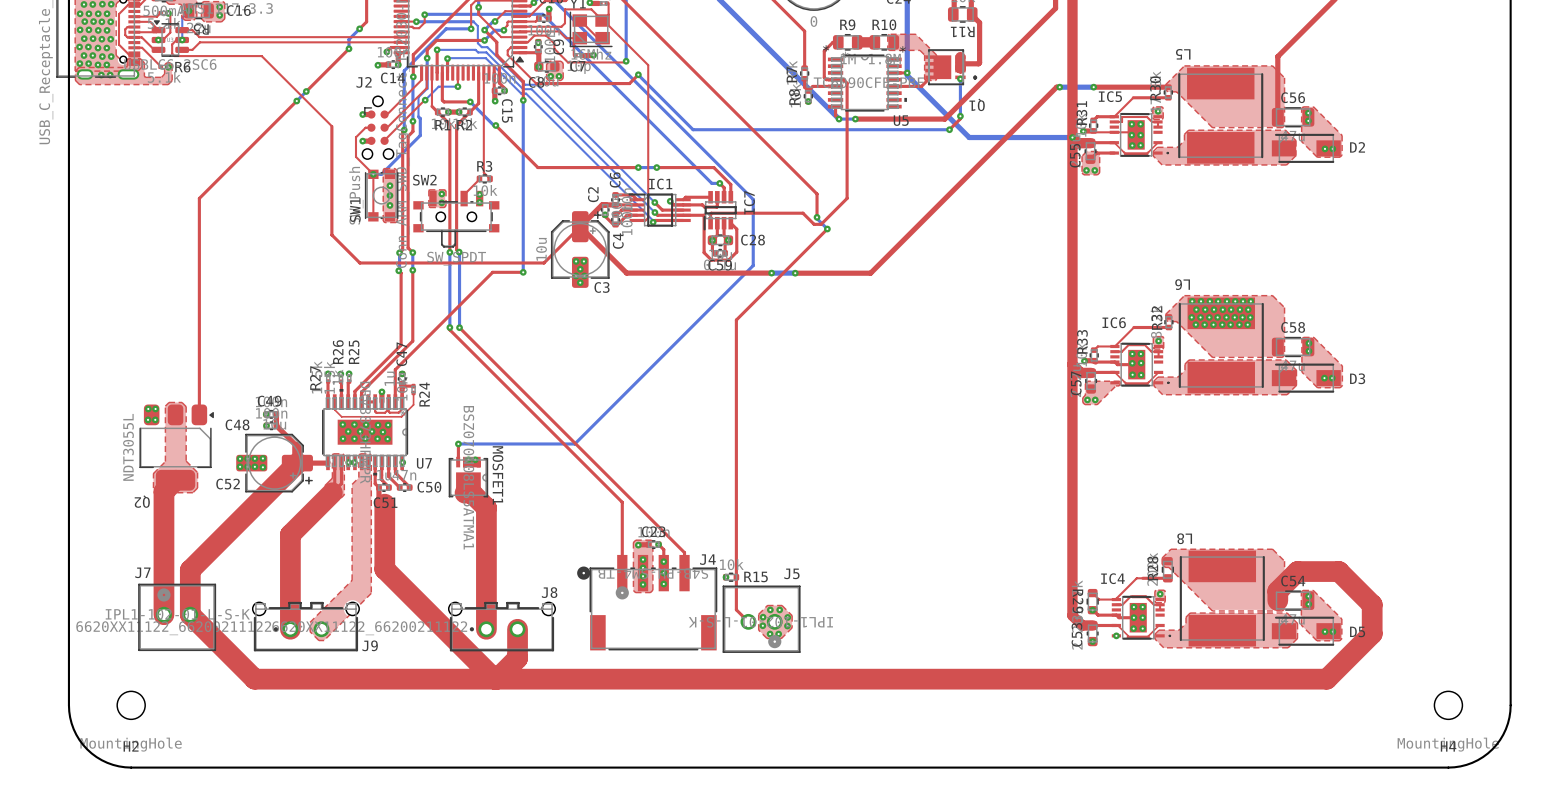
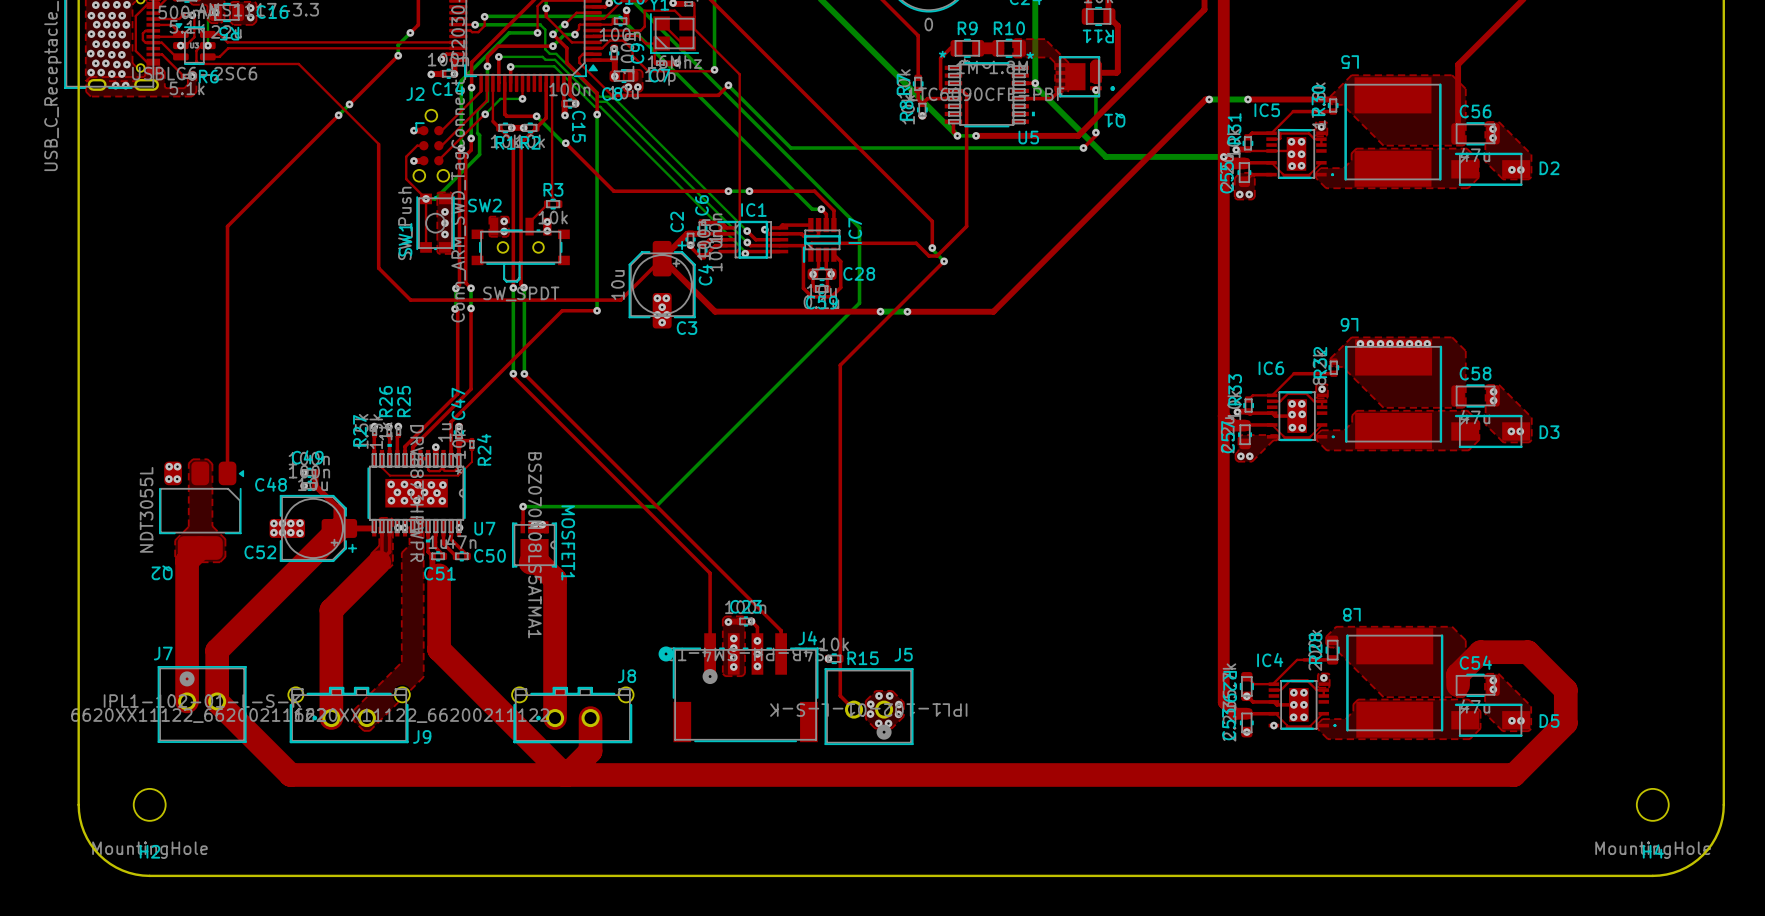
via: (1196, 309) -> none
via: (1205, 309) -> none
via: (1214, 309) -> none
via: (1222, 309) -> none
via: (1231, 309) -> none
via: (1239, 309) -> none
via: (1248, 309) -> none
via: (1191, 317) -> none
via: (1200, 317) -> none
via: (1209, 317) -> none
via: (1217, 317) -> none
via: (1226, 317) -> none
via: (1234, 317) -> none
via: (1242, 317) -> none
via: (1250, 317) -> none
via: (1195, 324) -> none
via: (1204, 324) -> none
via: (1213, 324) -> none
via: (1222, 324) -> none
via: (1230, 324) -> none
via: (1239, 324) -> none
via: (1247, 324) -> none

